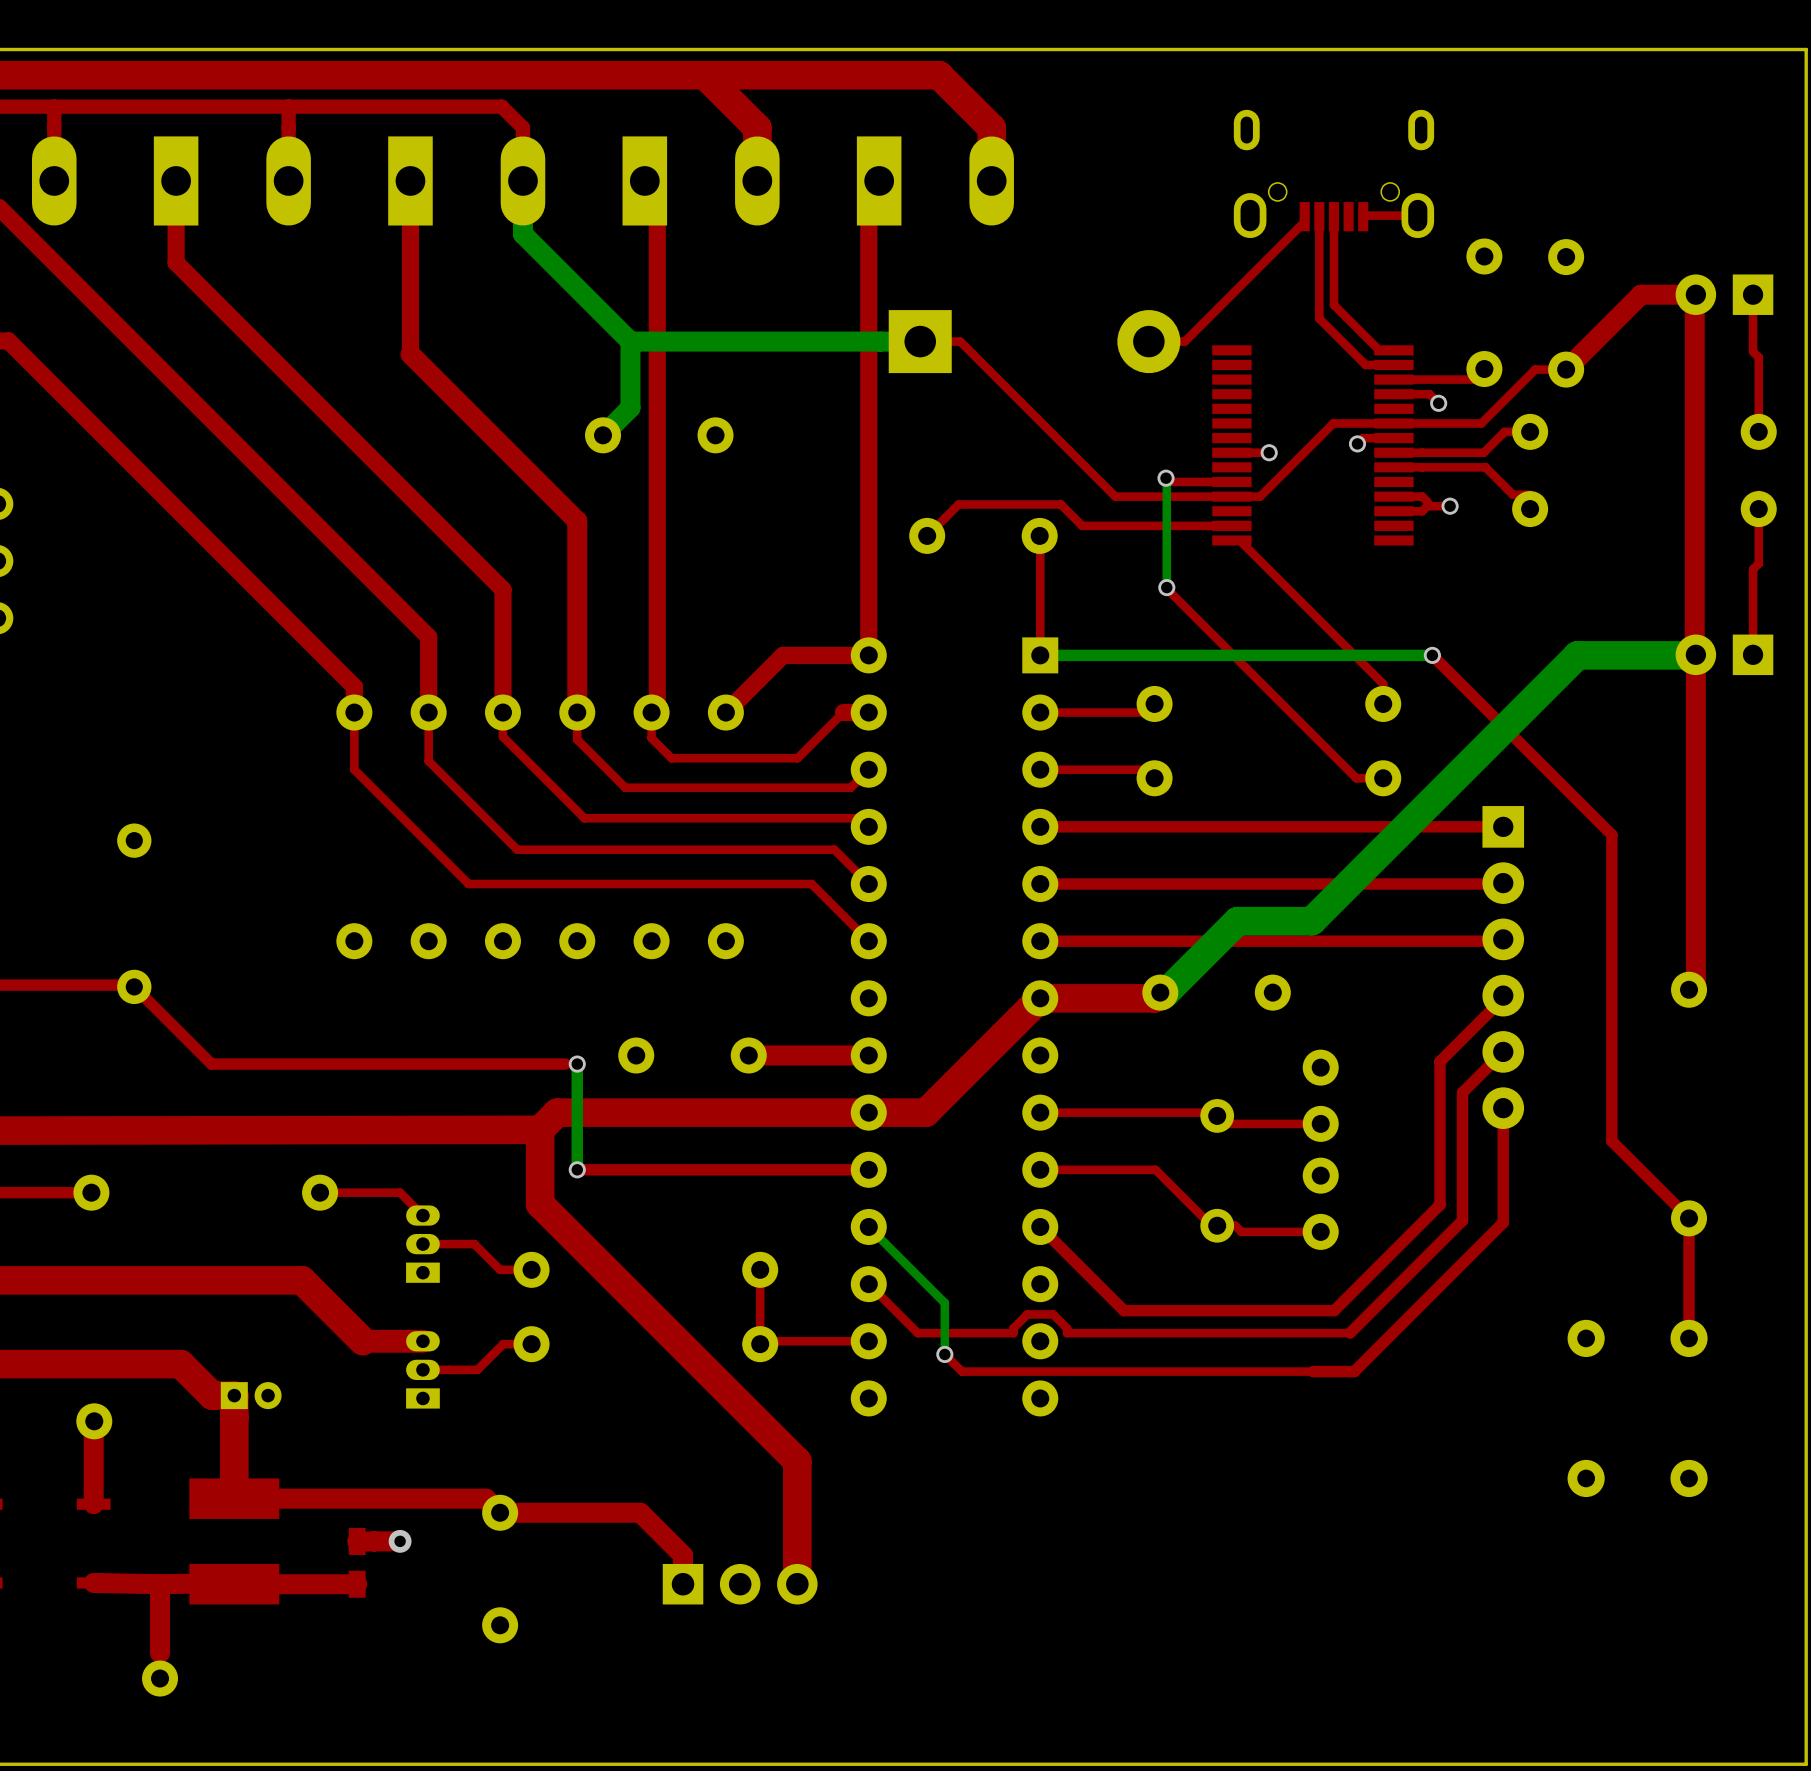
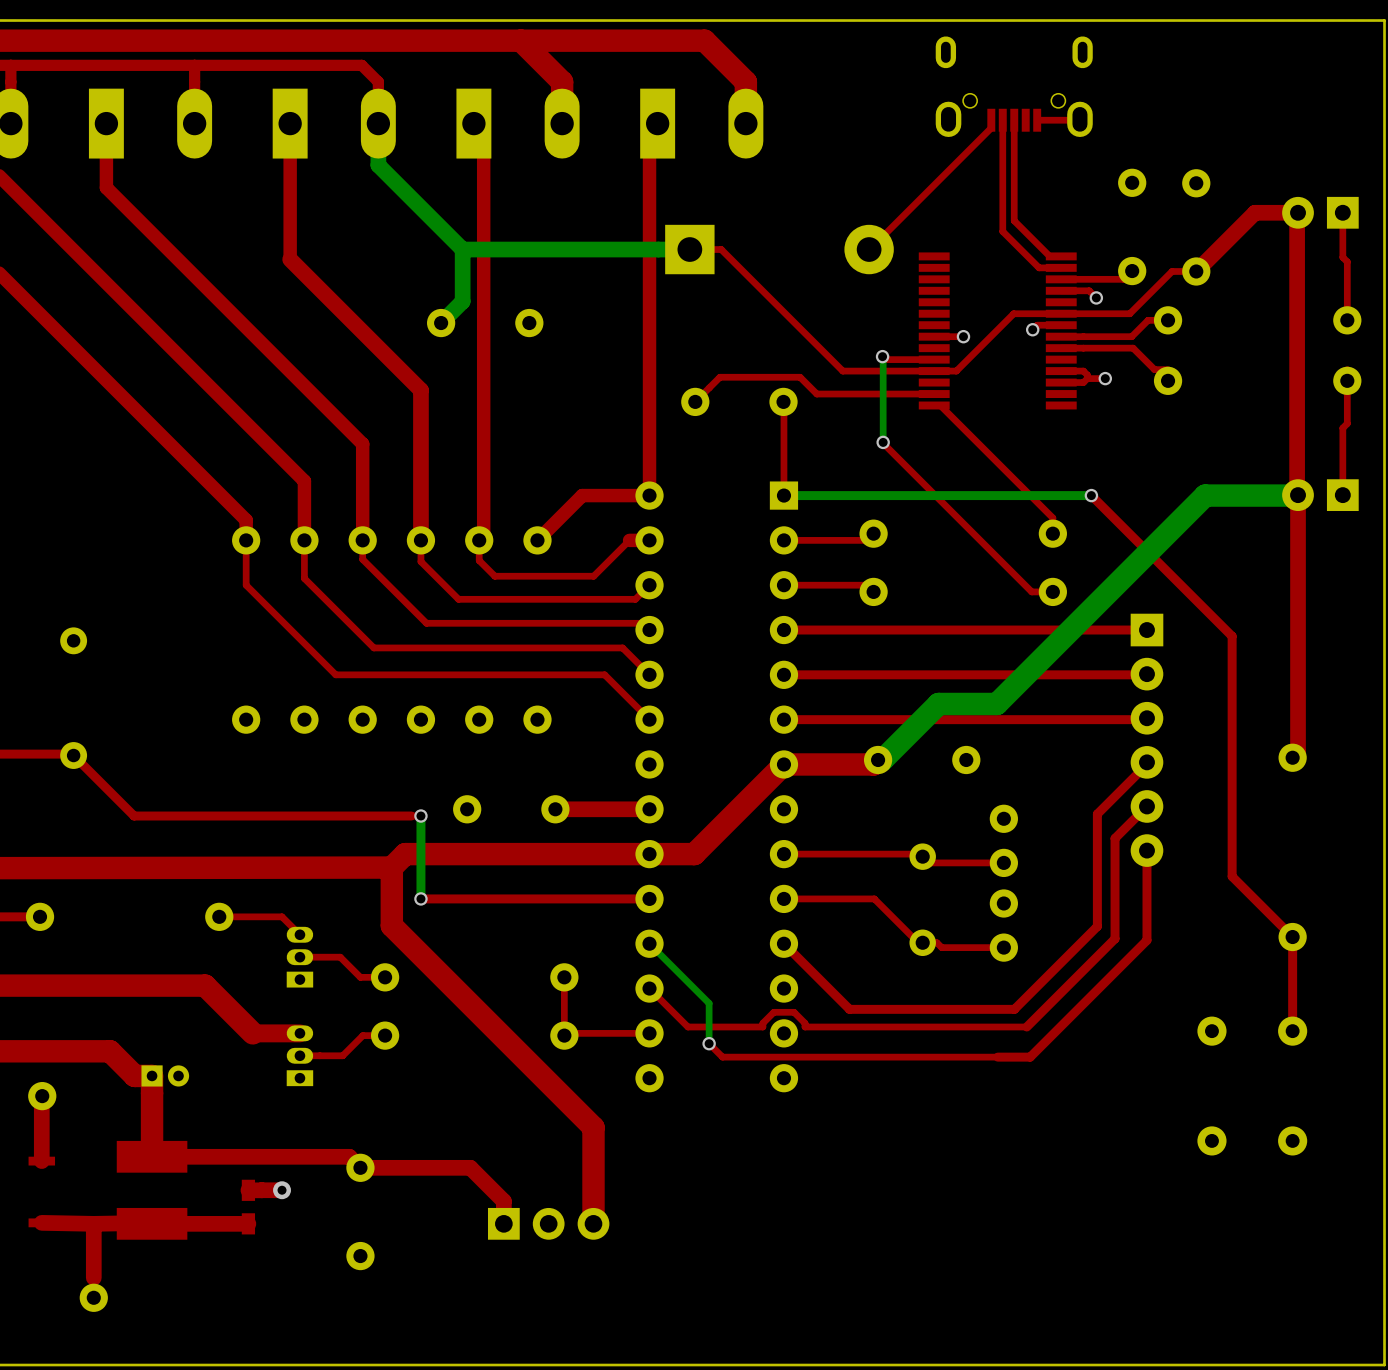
part position: (1333, 173) -> (1014, 86)
top track: none -> (1079, 119) (1037, 120)
top track: none -> (1002, 120) (1002, 151)
top track: none -> (1014, 120) (1014, 151)
top track: (1417, 215) (1363, 216) -> none
top track: (1304, 216) (1304, 221) (1184, 341) (1149, 341) -> (991, 120) (991, 128) (869, 249)

